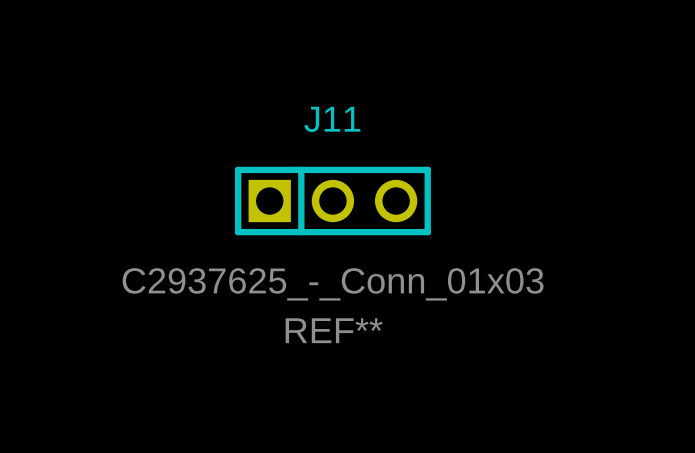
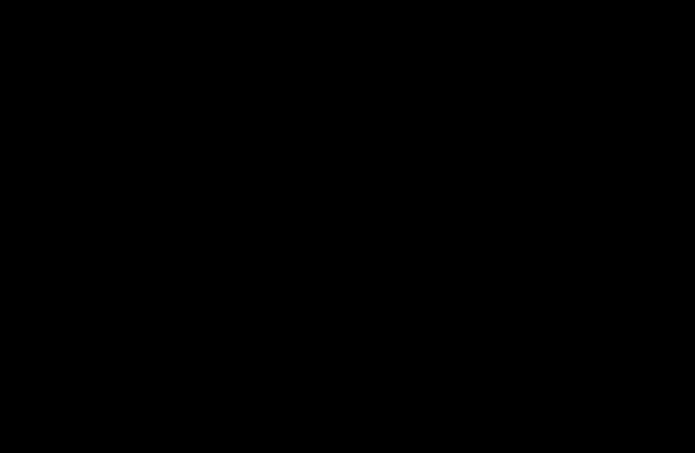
J11: C2937625_-_Conn_01x03 (332, 201) -> none

